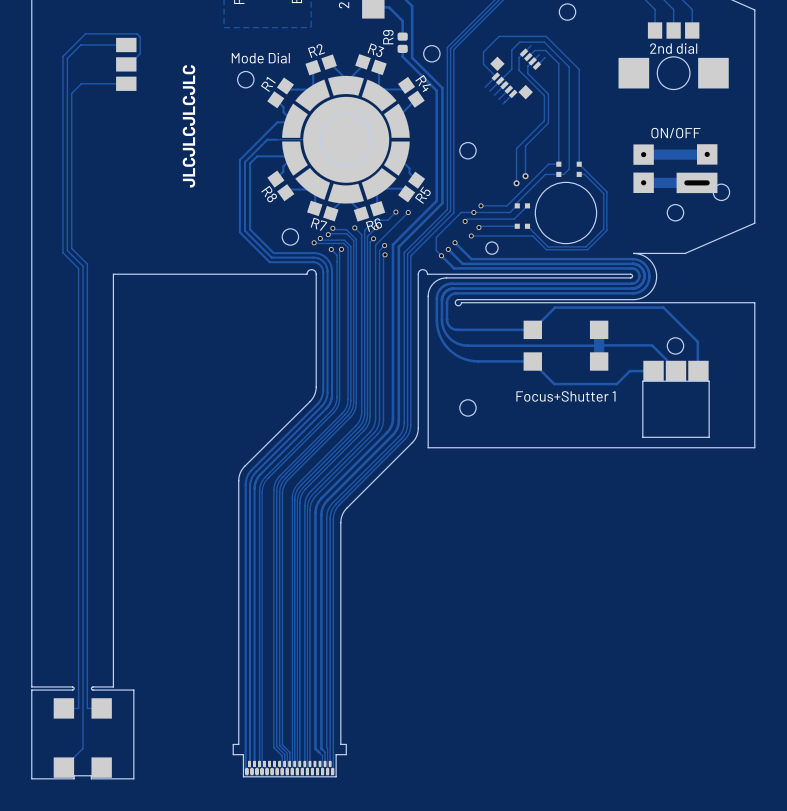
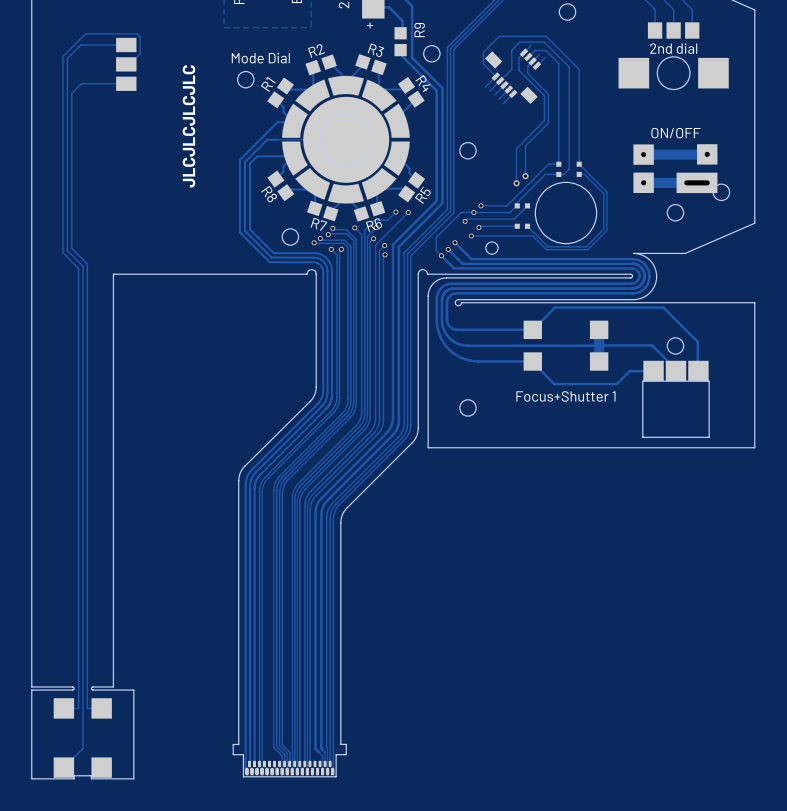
text: none -> + (370, 25)
R9 footprint: [397, 32, 408, 53] -> [394, 27, 407, 57]
R9 name position: R9 (388, 37) -> R9 (419, 30)
part footprint: [490, 48, 542, 100] -> [485, 48, 542, 104]

